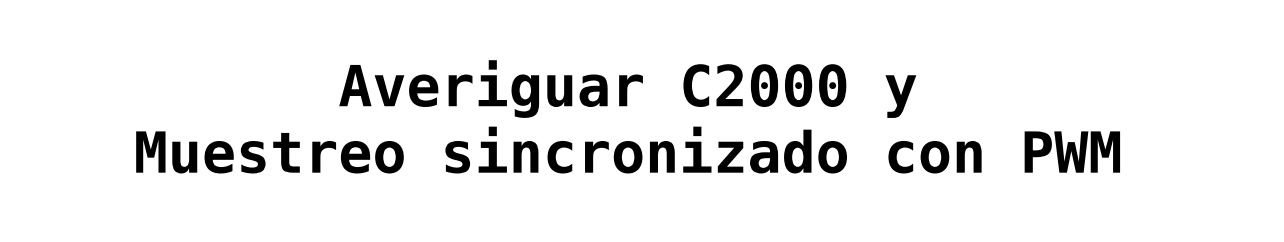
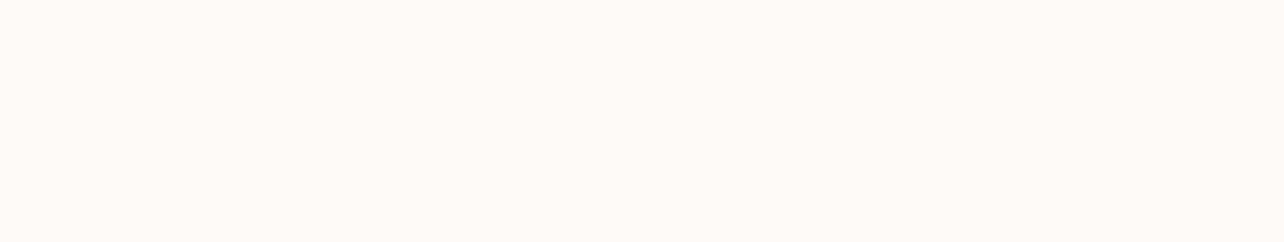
text: Averiguar C2000 y (627, 89) -> none
text: Muestreo sincronizado con PWM (628, 150) -> none

